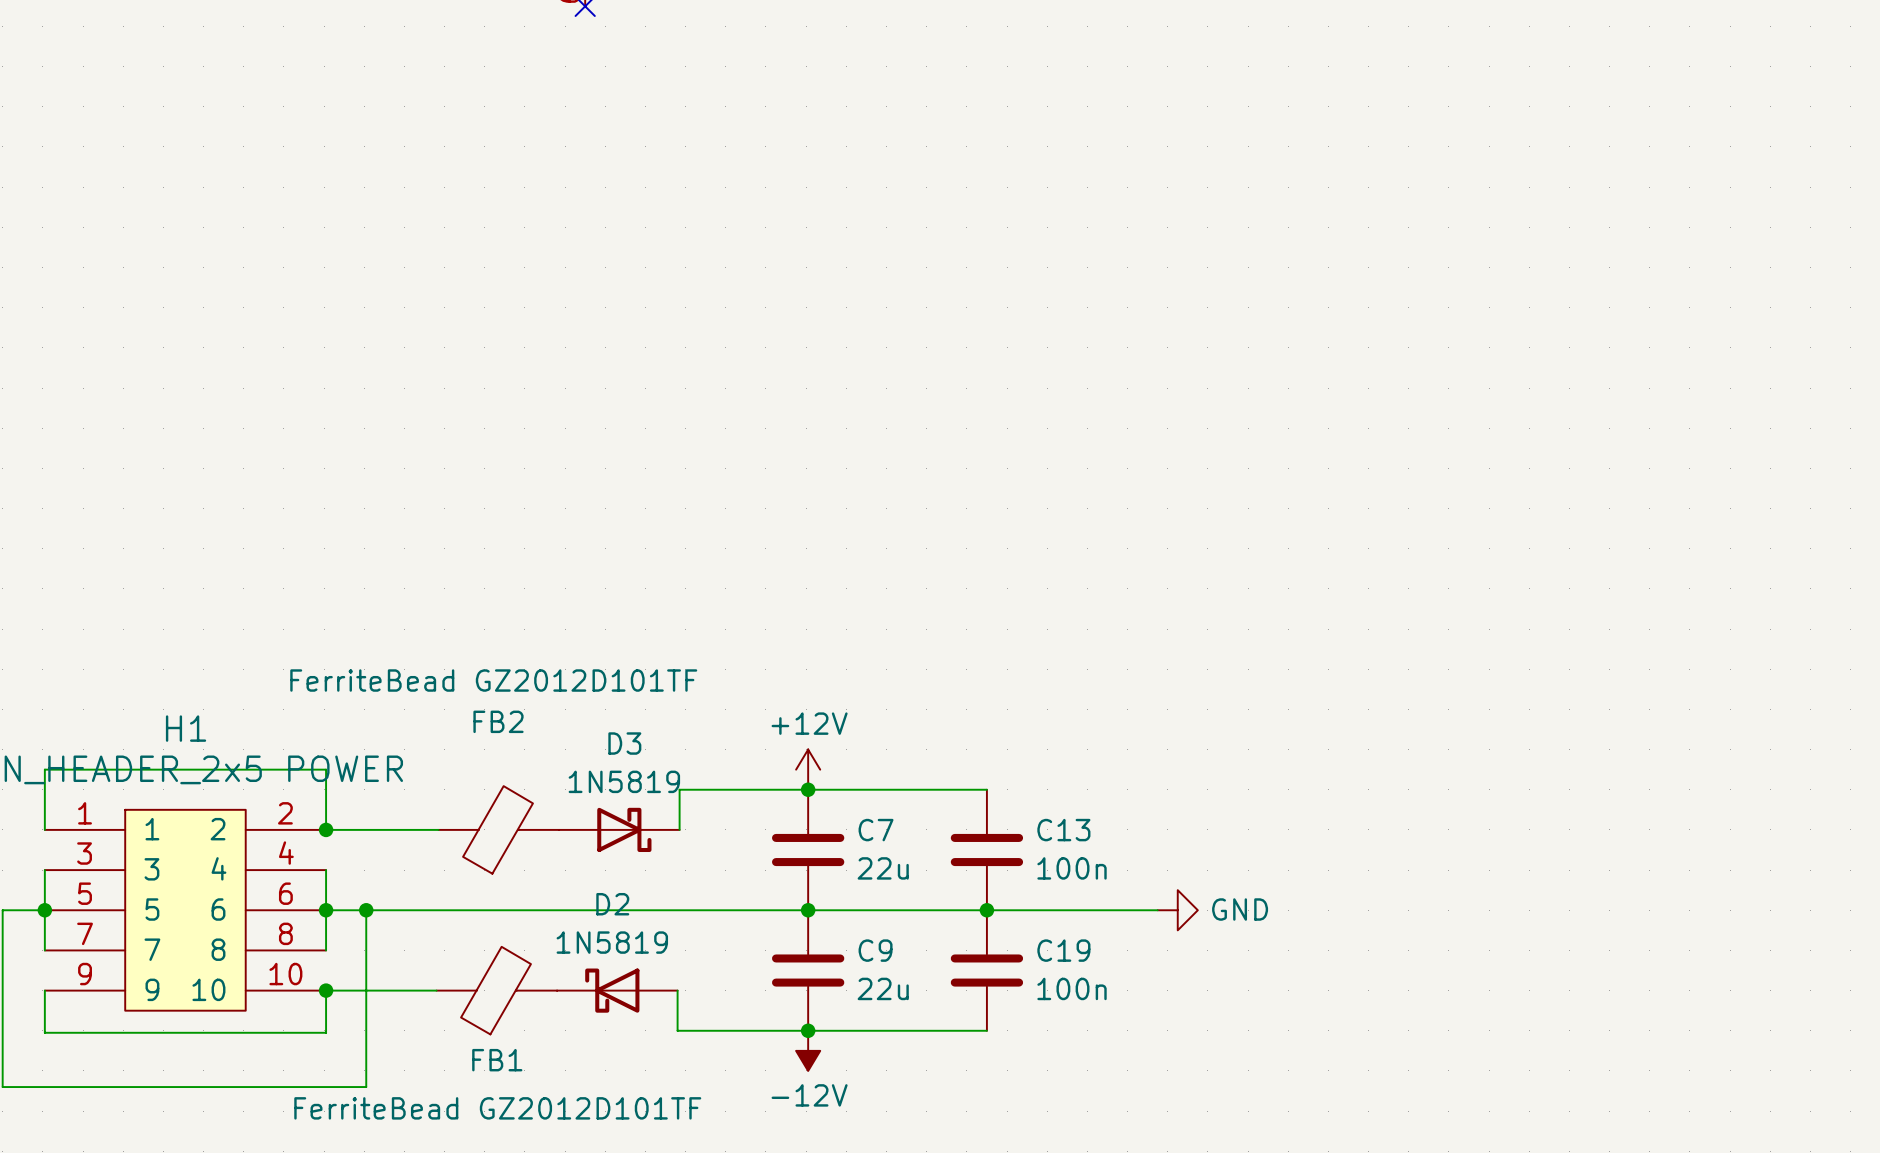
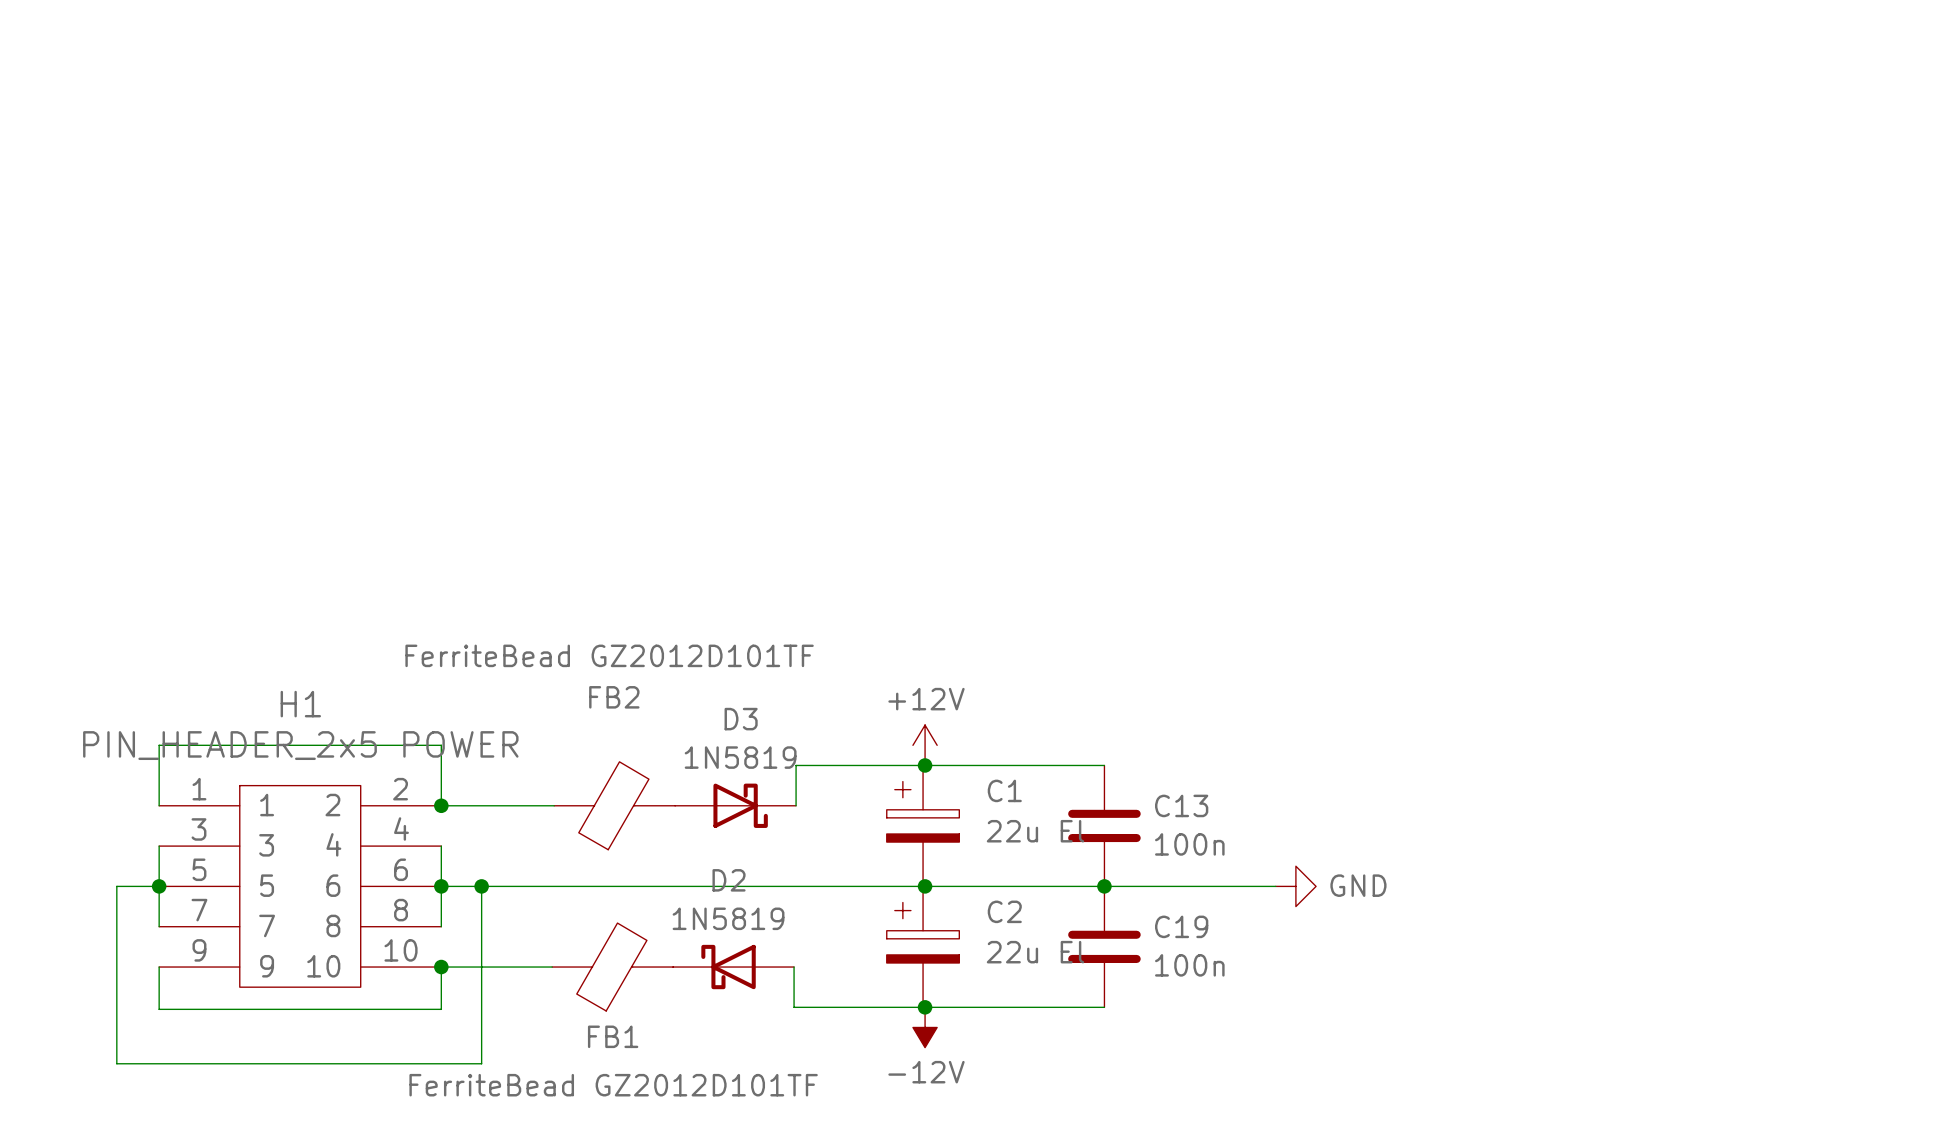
C1: none -> 22u El (923, 825)
C7: 22u (808, 850) -> none
C2: none -> 22u El (923, 946)
C9: 22u (808, 970) -> none

